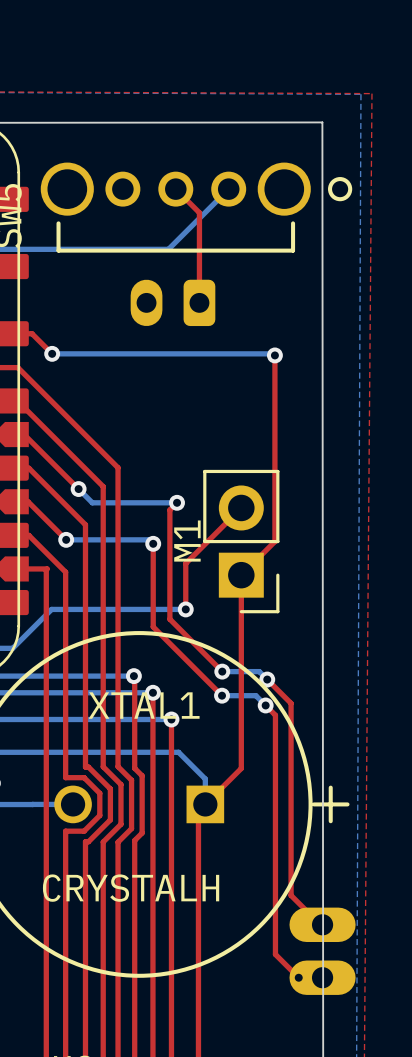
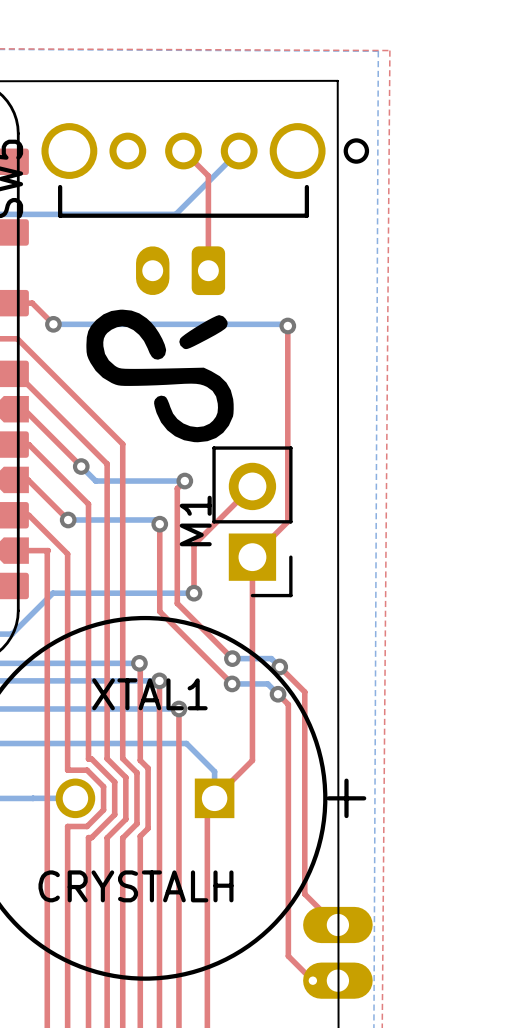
drawing: none -> [86, 309, 234, 443]

